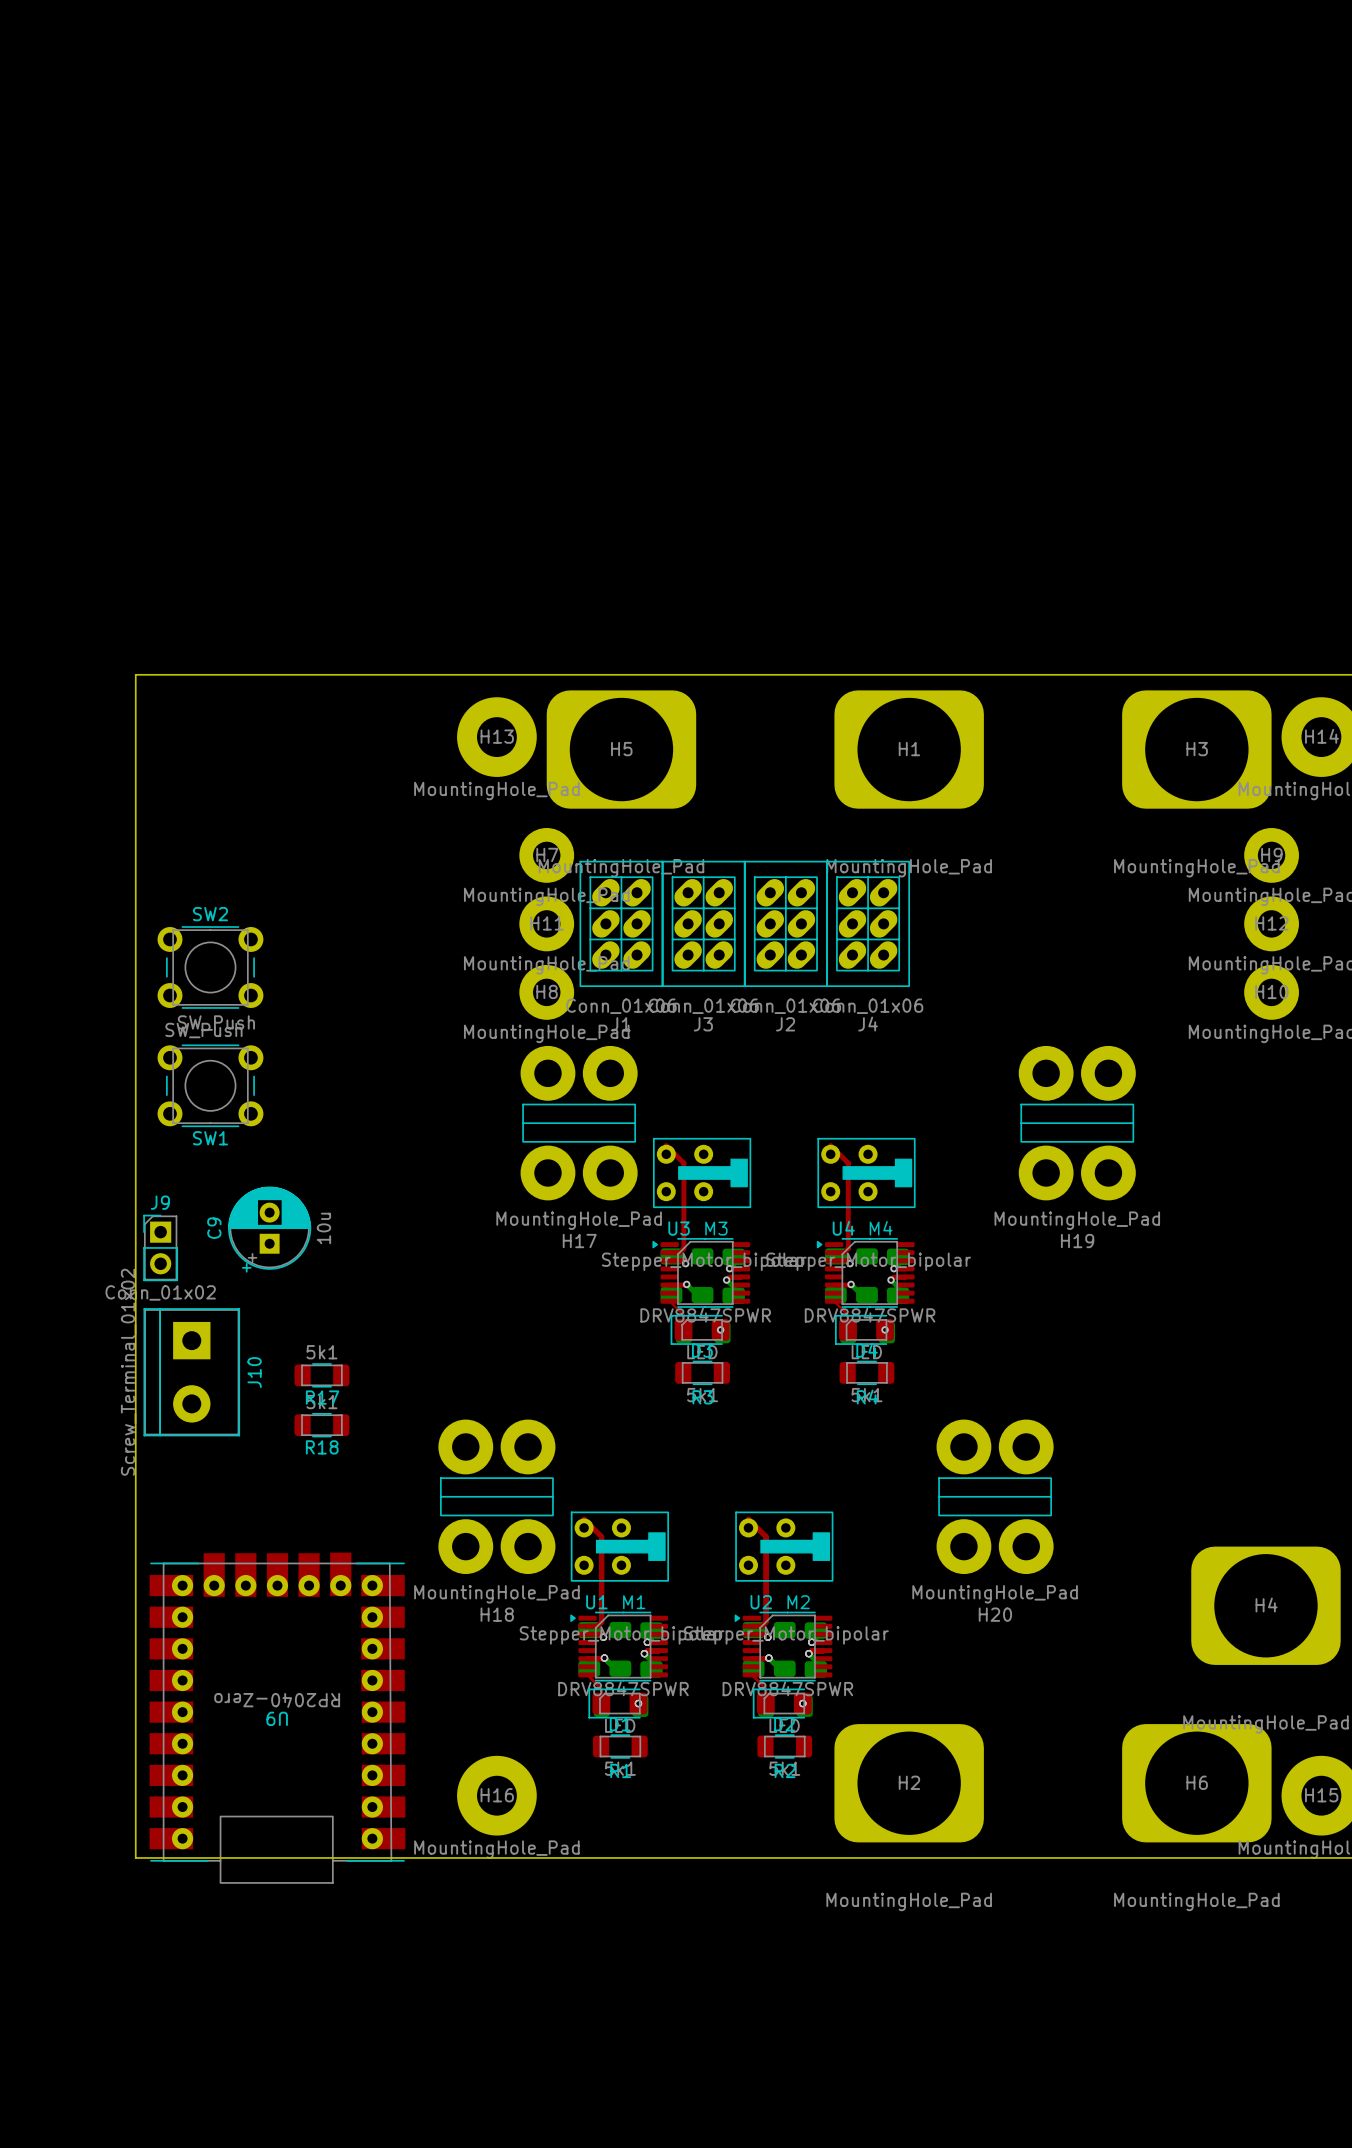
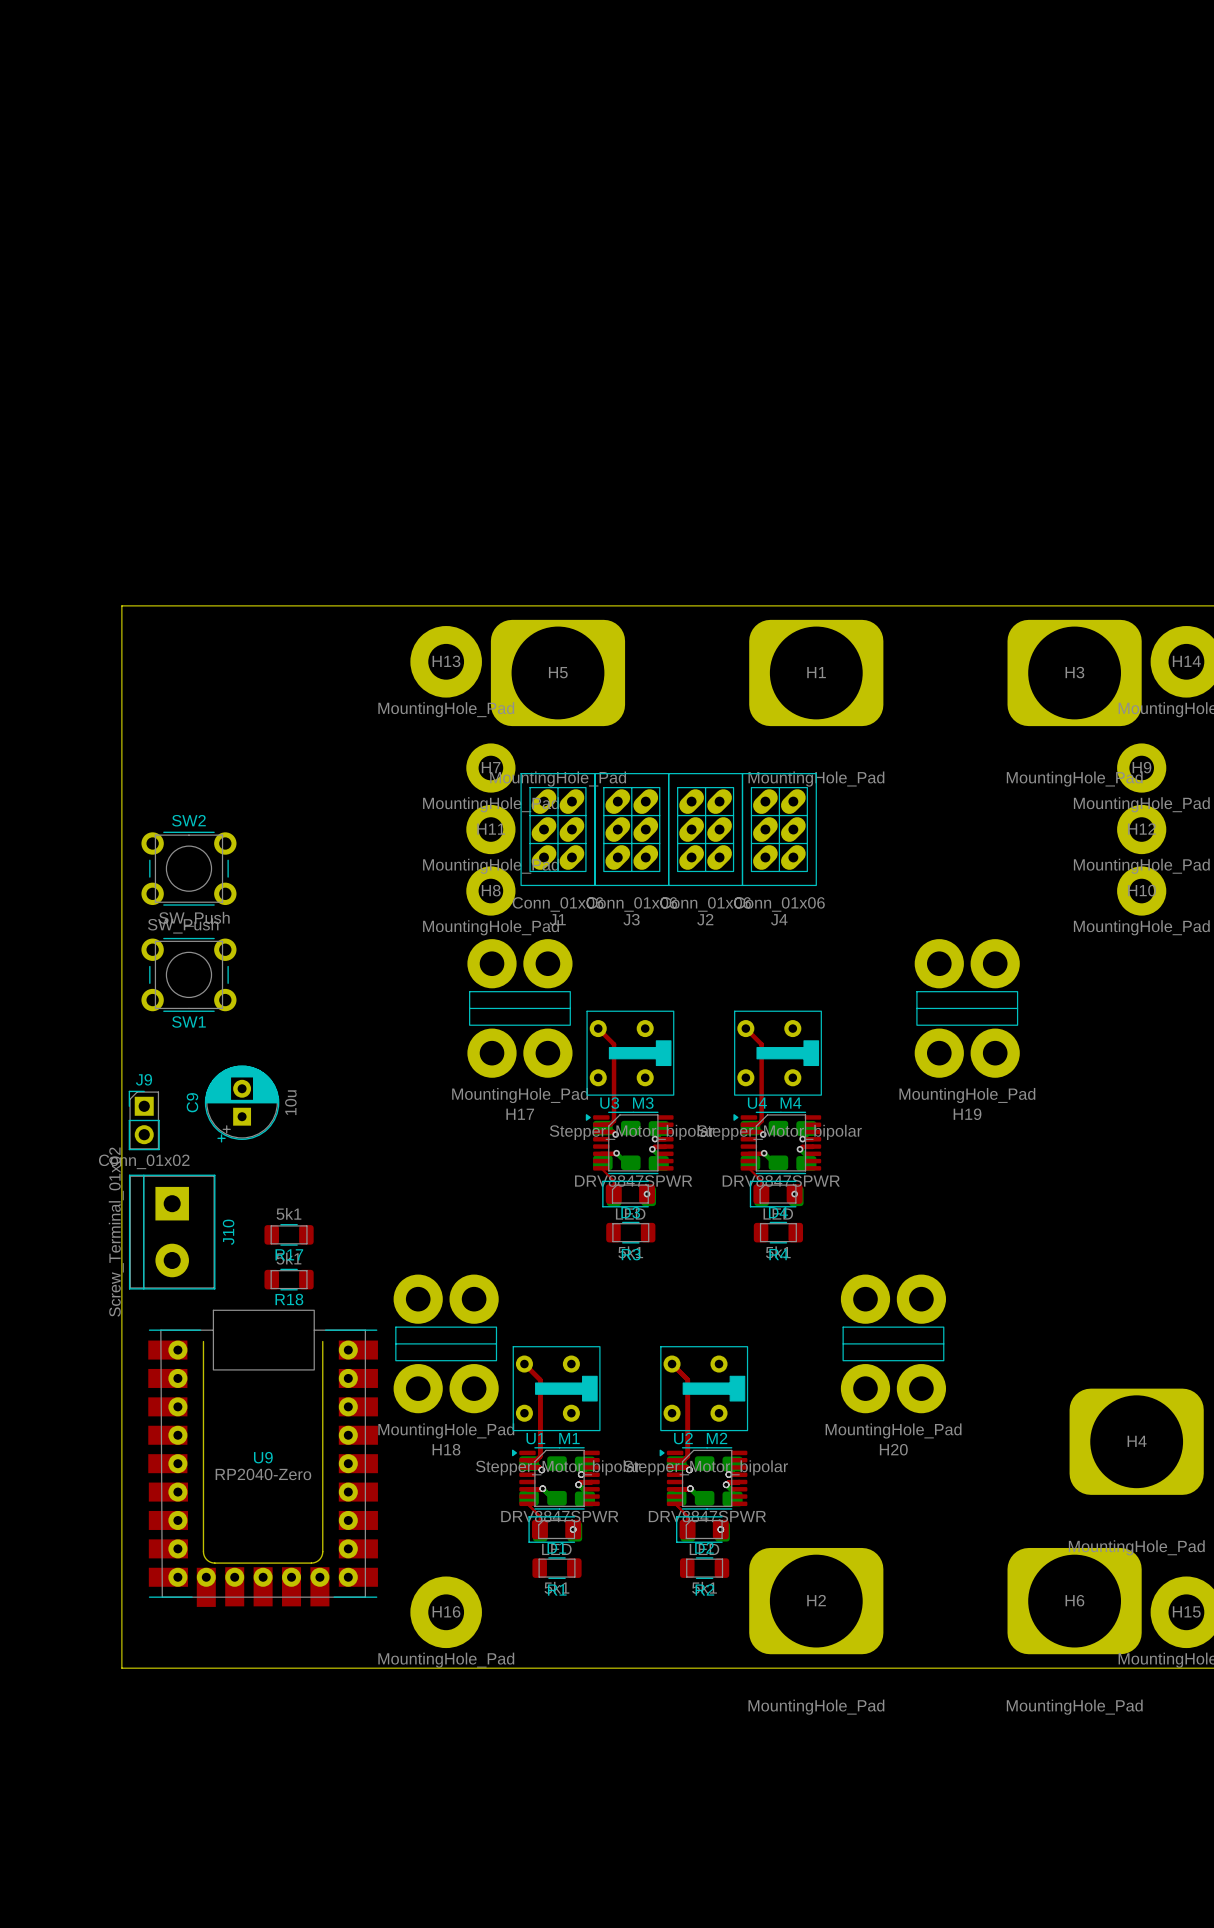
M3 footprint: [653, 1138, 751, 1208] -> [586, 1010, 675, 1096]
M4 footprint: [817, 1138, 916, 1208] -> [734, 1010, 822, 1096]
M1 footprint: [571, 1511, 669, 1582] -> [512, 1346, 601, 1432]
M2 footprint: [735, 1511, 834, 1582] -> [660, 1346, 749, 1432]
U9 footprint: [149, 1552, 406, 1884] -> [148, 1309, 378, 1607]
U9 value position: RP2040-Zero (277, 1700) -> RP2040-Zero (263, 1474)

